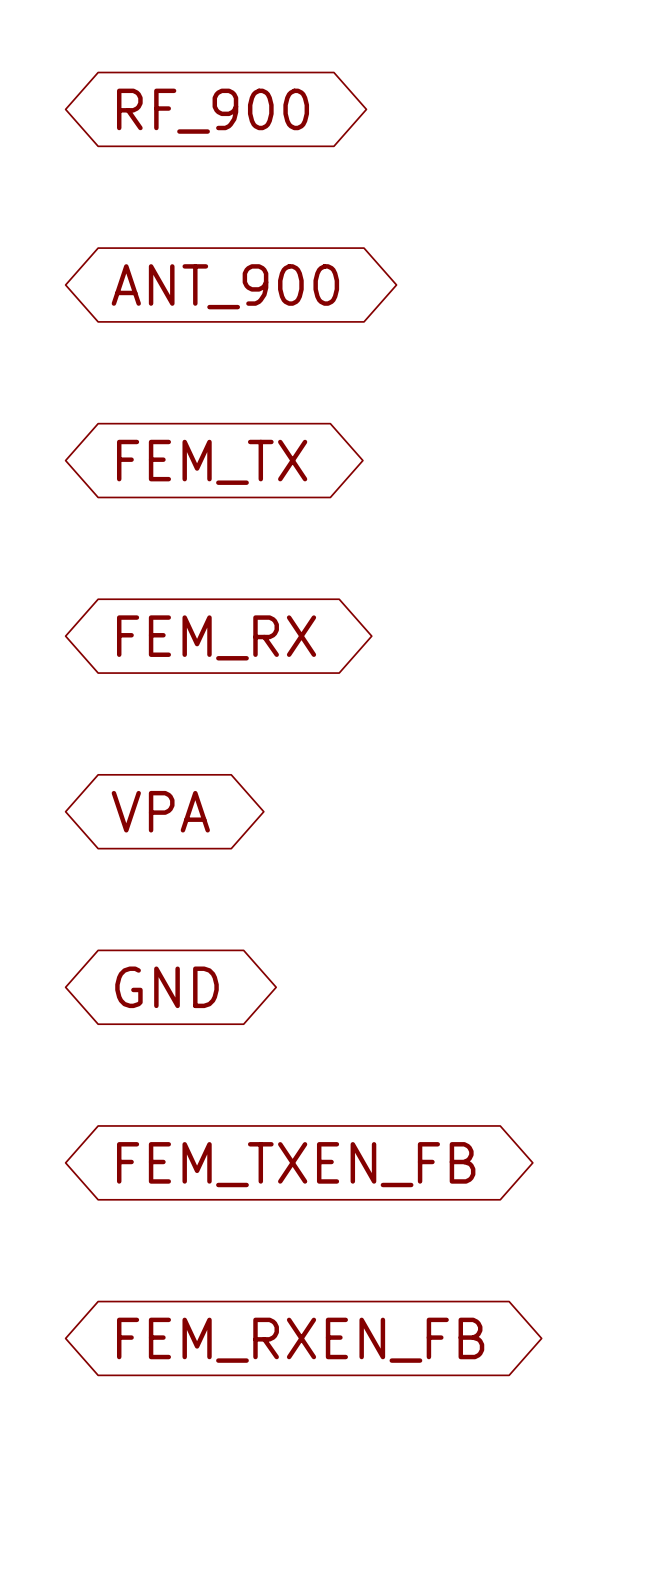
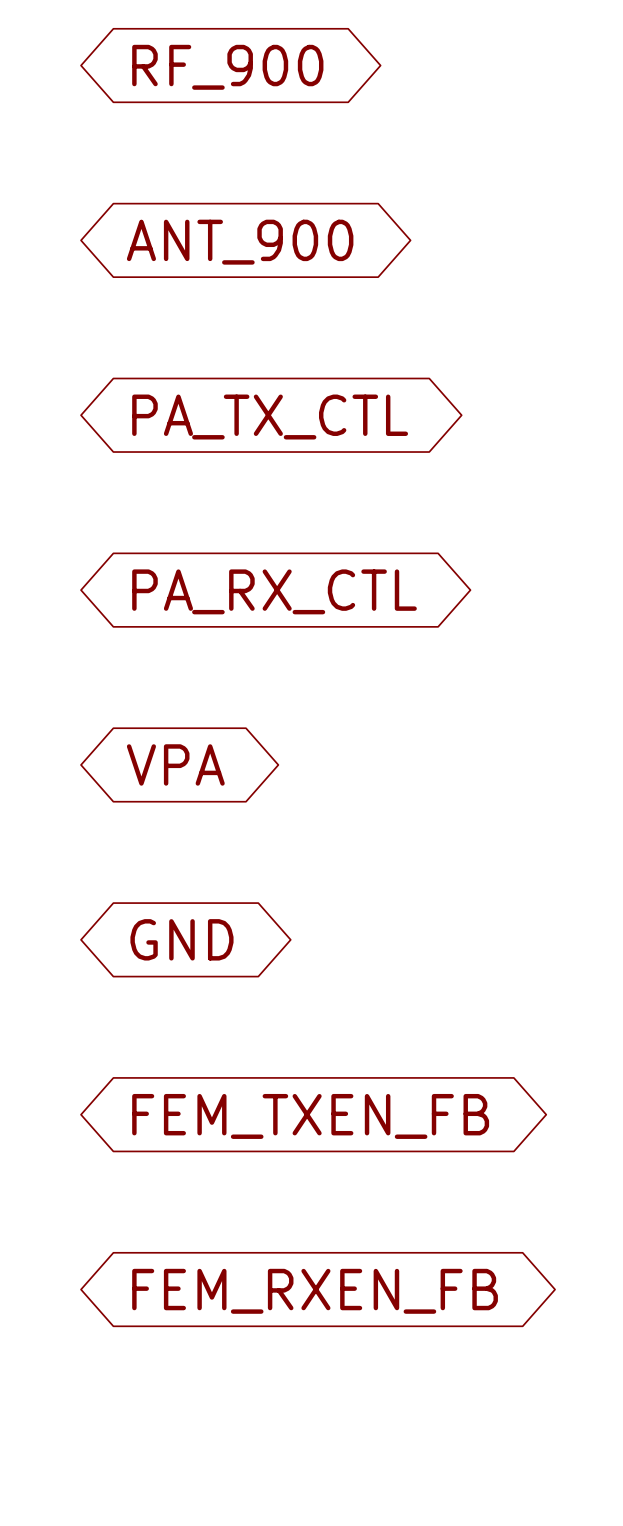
global label: FEM_TX (212, 462) -> PA_TX_CTL (270, 417)
global label: FEM_RX (216, 637) -> PA_RX_CTL (274, 591)

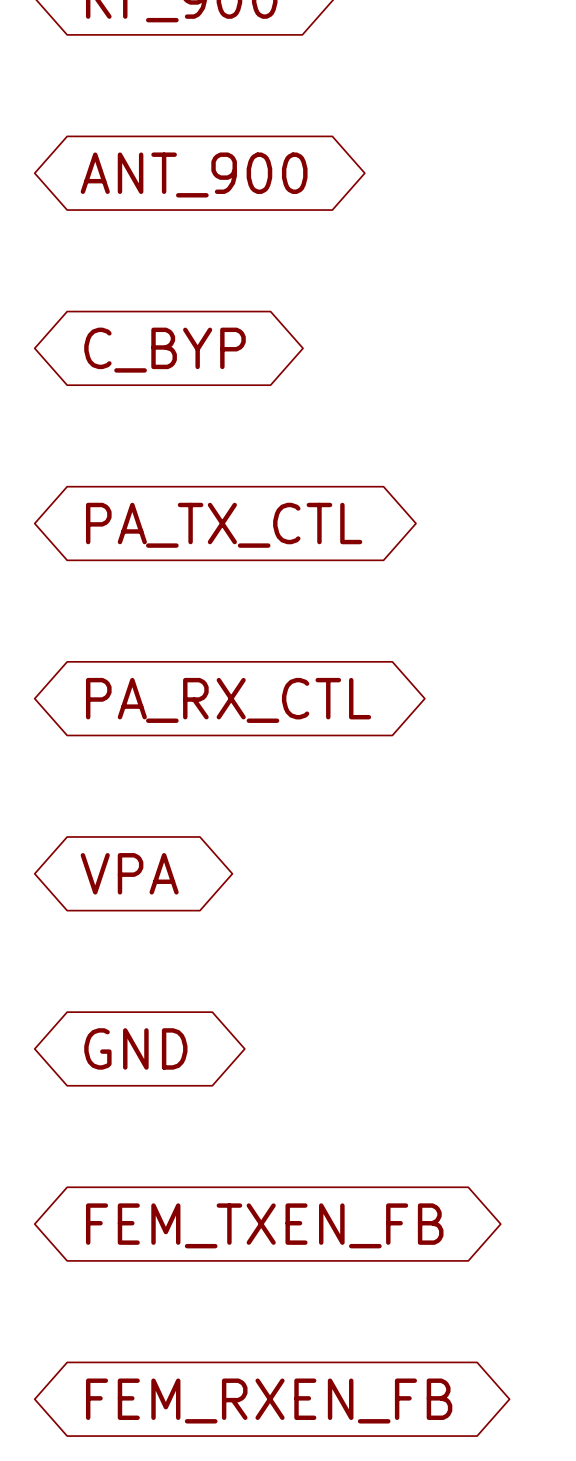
global label: PA_TX_CTL (270, 417) -> C_BYP (164, 350)
global label: PA_RX_CTL (274, 591) -> PA_TX_CTL (224, 525)
global label: VPA (175, 764) -> PA_RX_CTL (228, 700)
global label: GND (181, 939) -> VPA (129, 873)
global label: FEM_TXEN_FB (310, 1116) -> GND (135, 1048)
global label: FEM_RXEN_FB (315, 1291) -> FEM_TXEN_FB (264, 1225)
global label: none -> FEM_RXEN_FB (269, 1401)

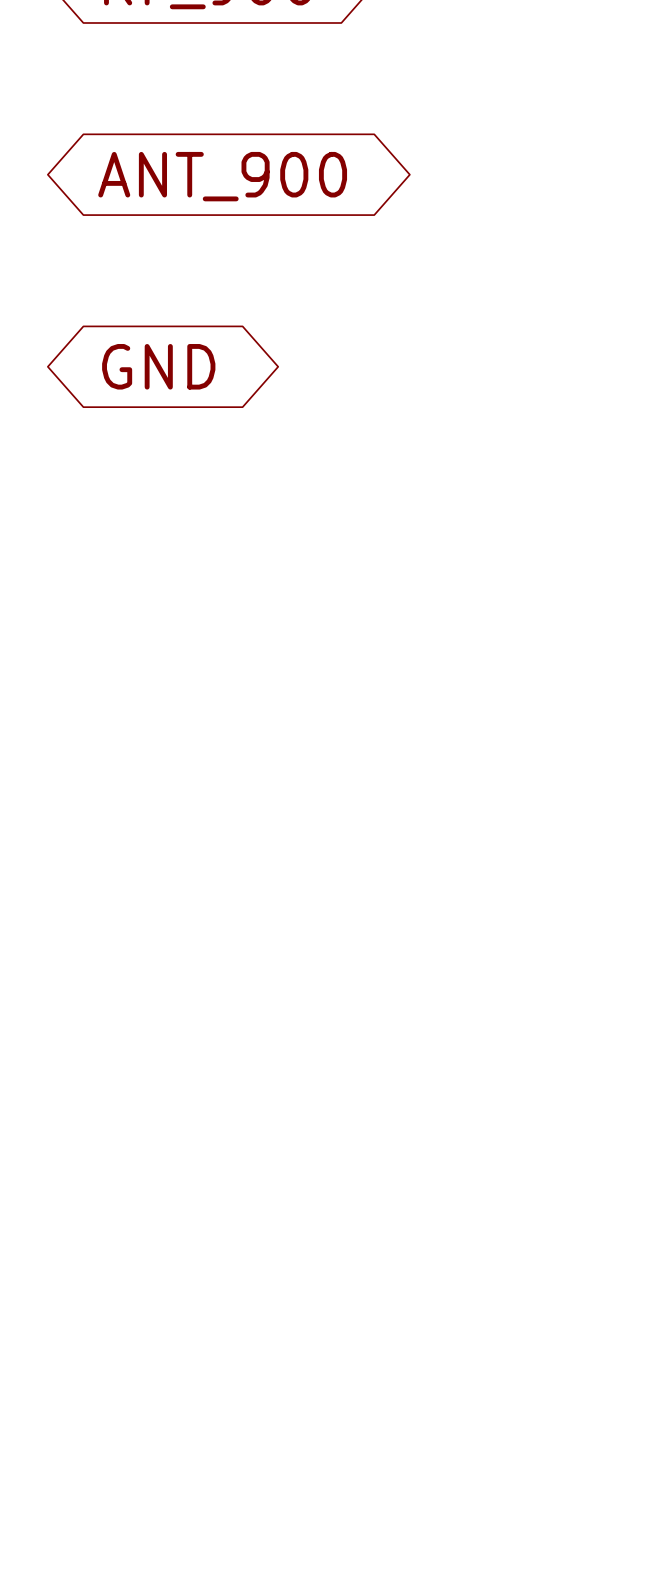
global label: C_BYP (164, 350) -> GND (158, 366)
global label: PA_TX_CTL (224, 525) -> none
global label: PA_RX_CTL (228, 700) -> none
global label: VPA (129, 873) -> none
global label: GND (135, 1048) -> none
global label: FEM_TXEN_FB (264, 1225) -> none
global label: FEM_RXEN_FB (269, 1401) -> none

